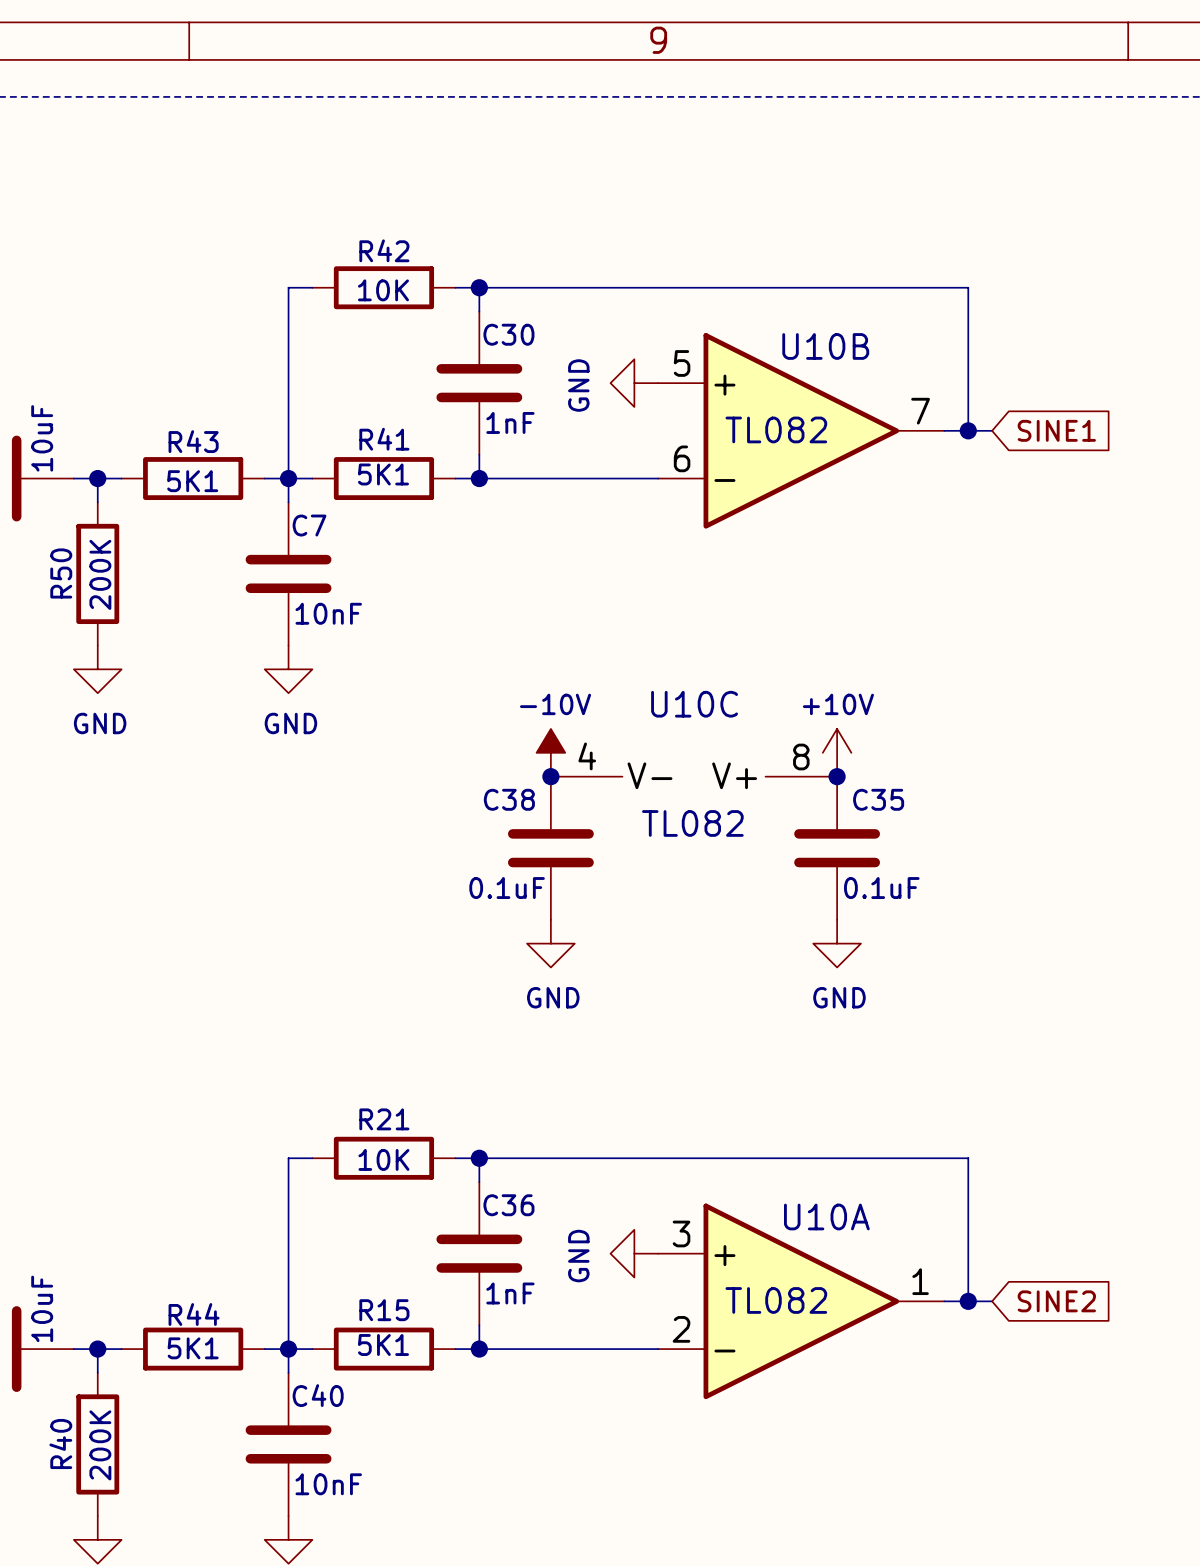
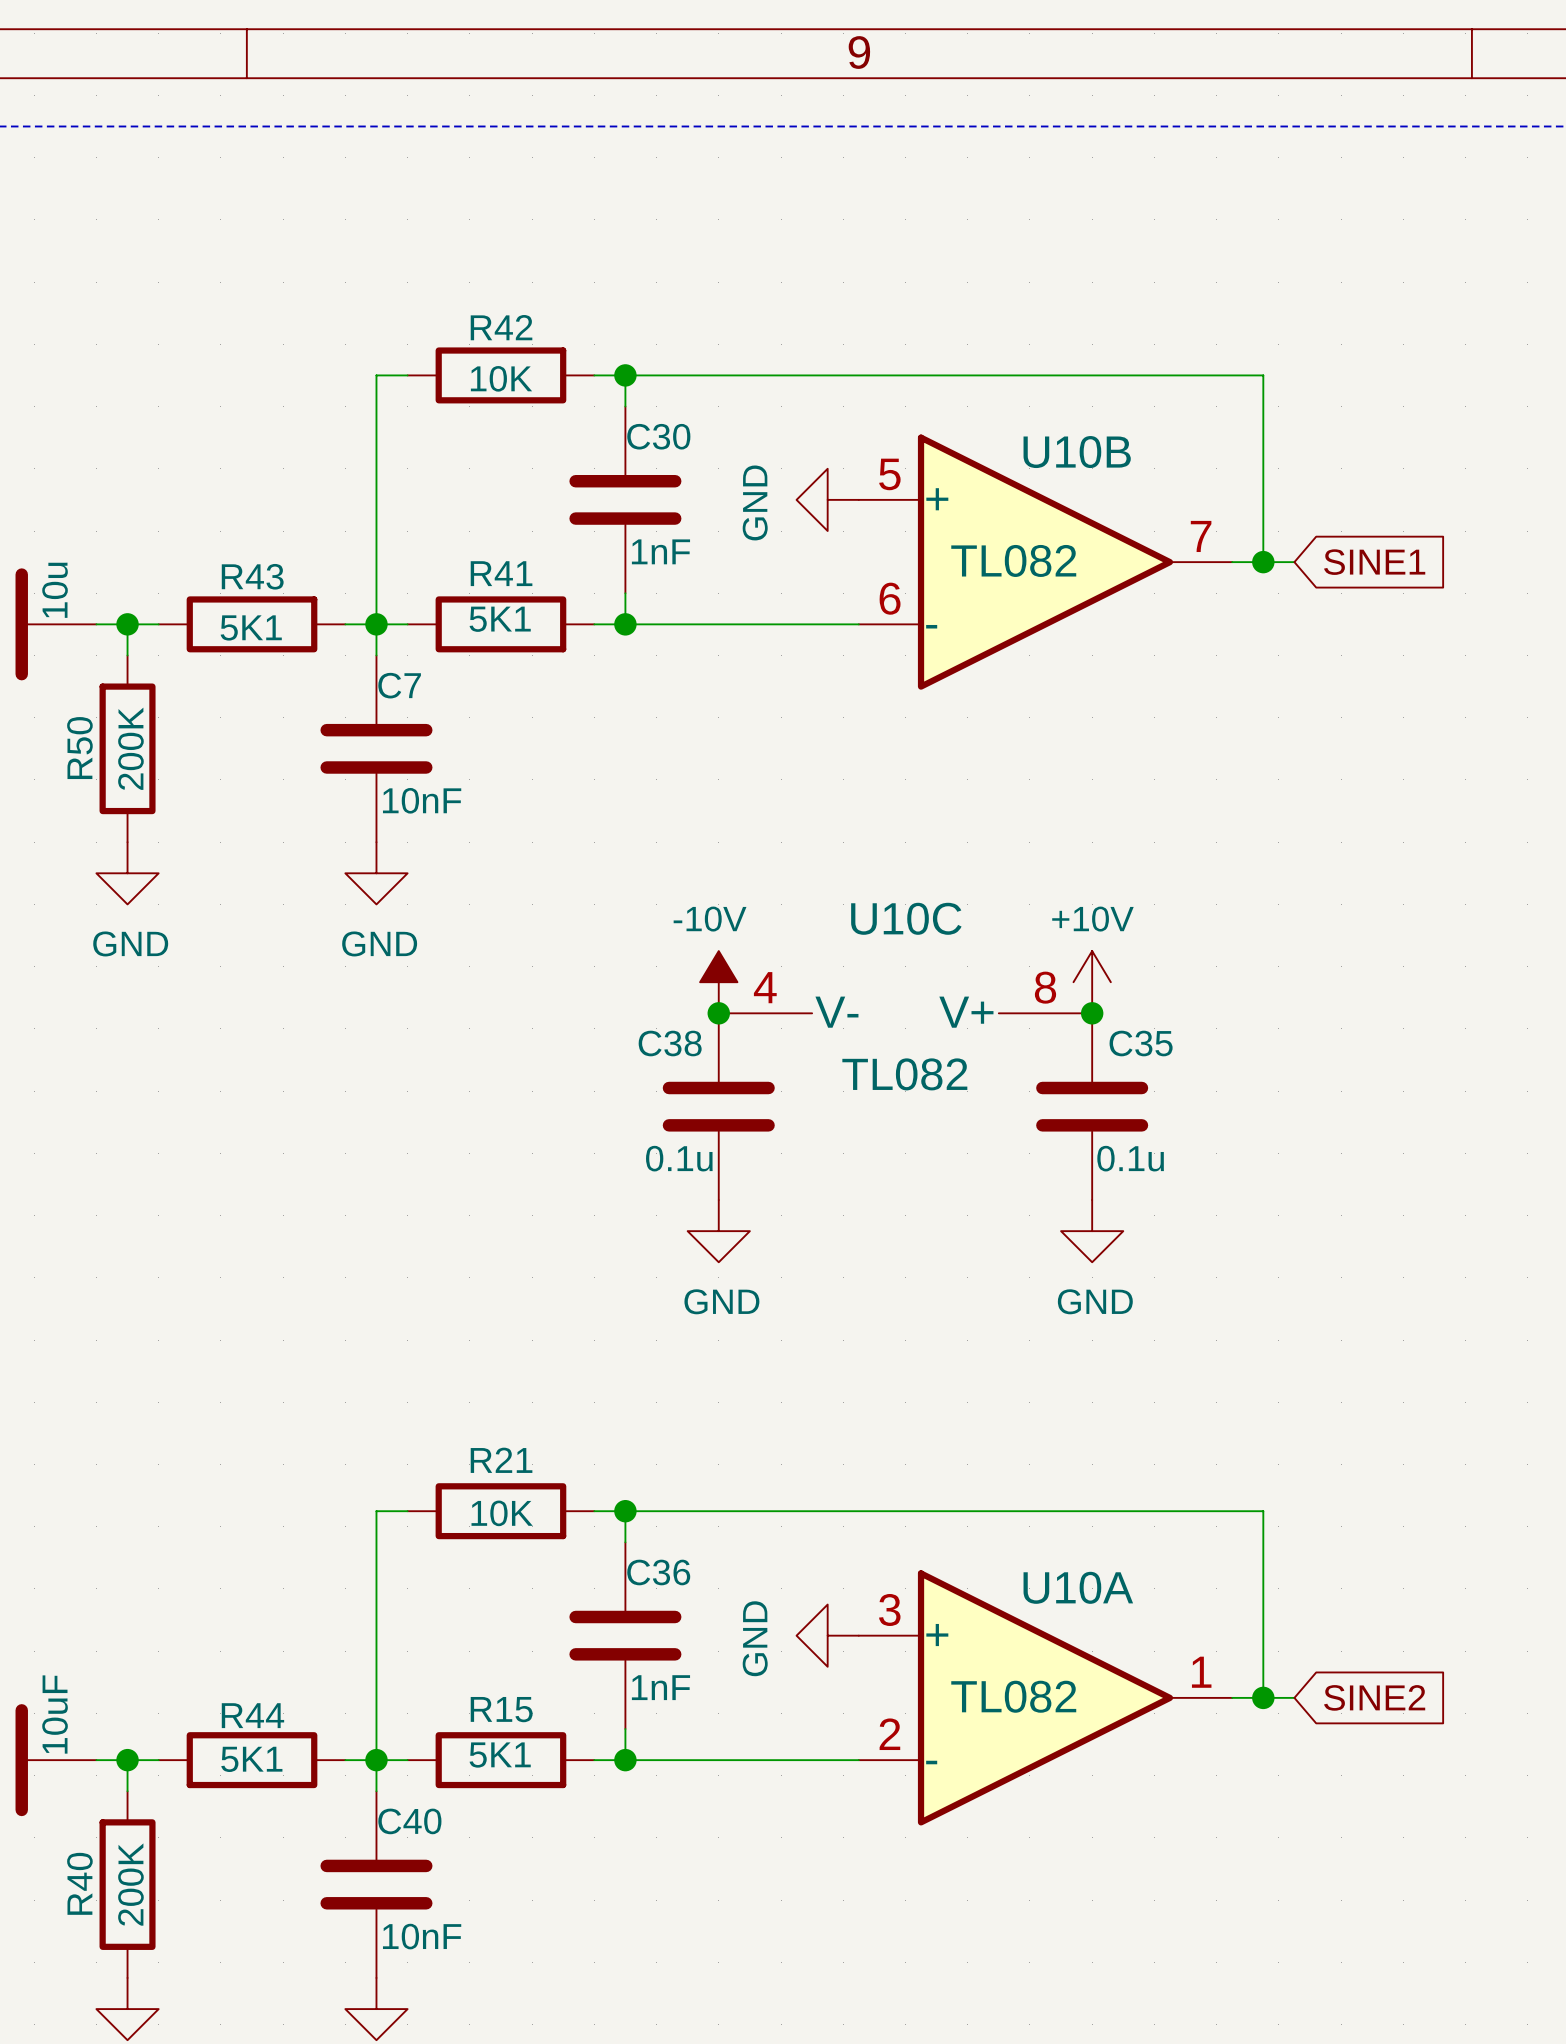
part value: 10uF (42, 438) -> 10u (55, 590)
C38 value: 0.1uF (507, 888) -> 0.1u (679, 1158)
C35 value: 0.1uF (881, 888) -> 0.1u (1130, 1158)

